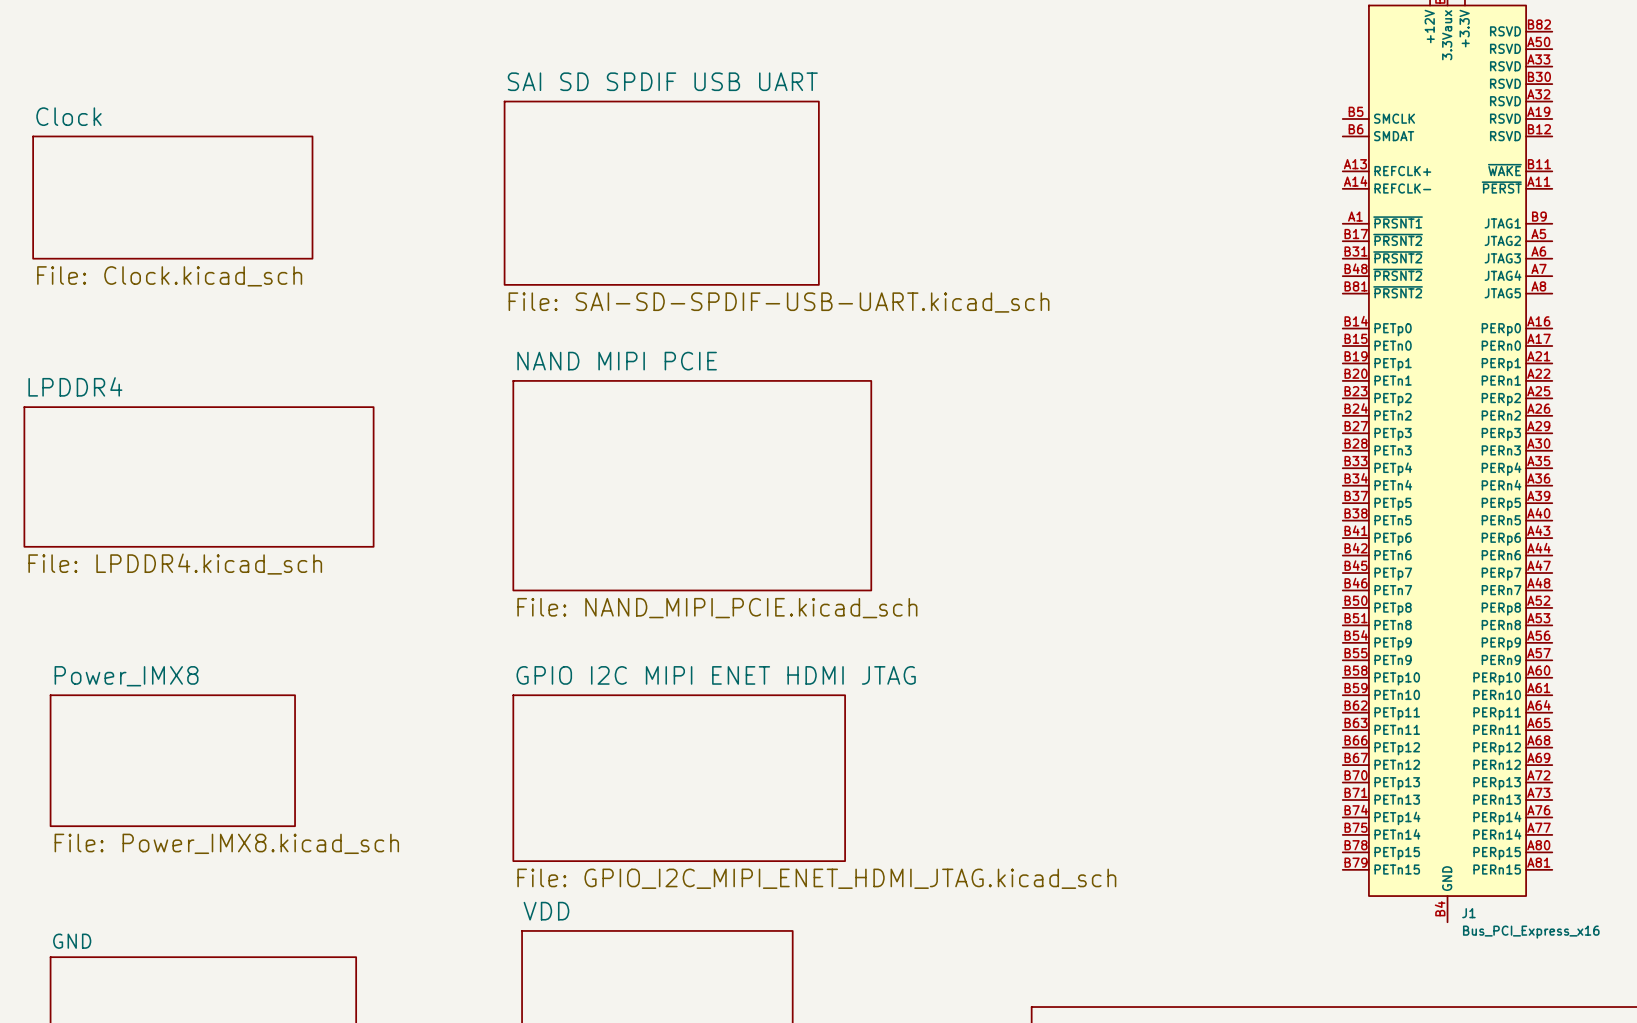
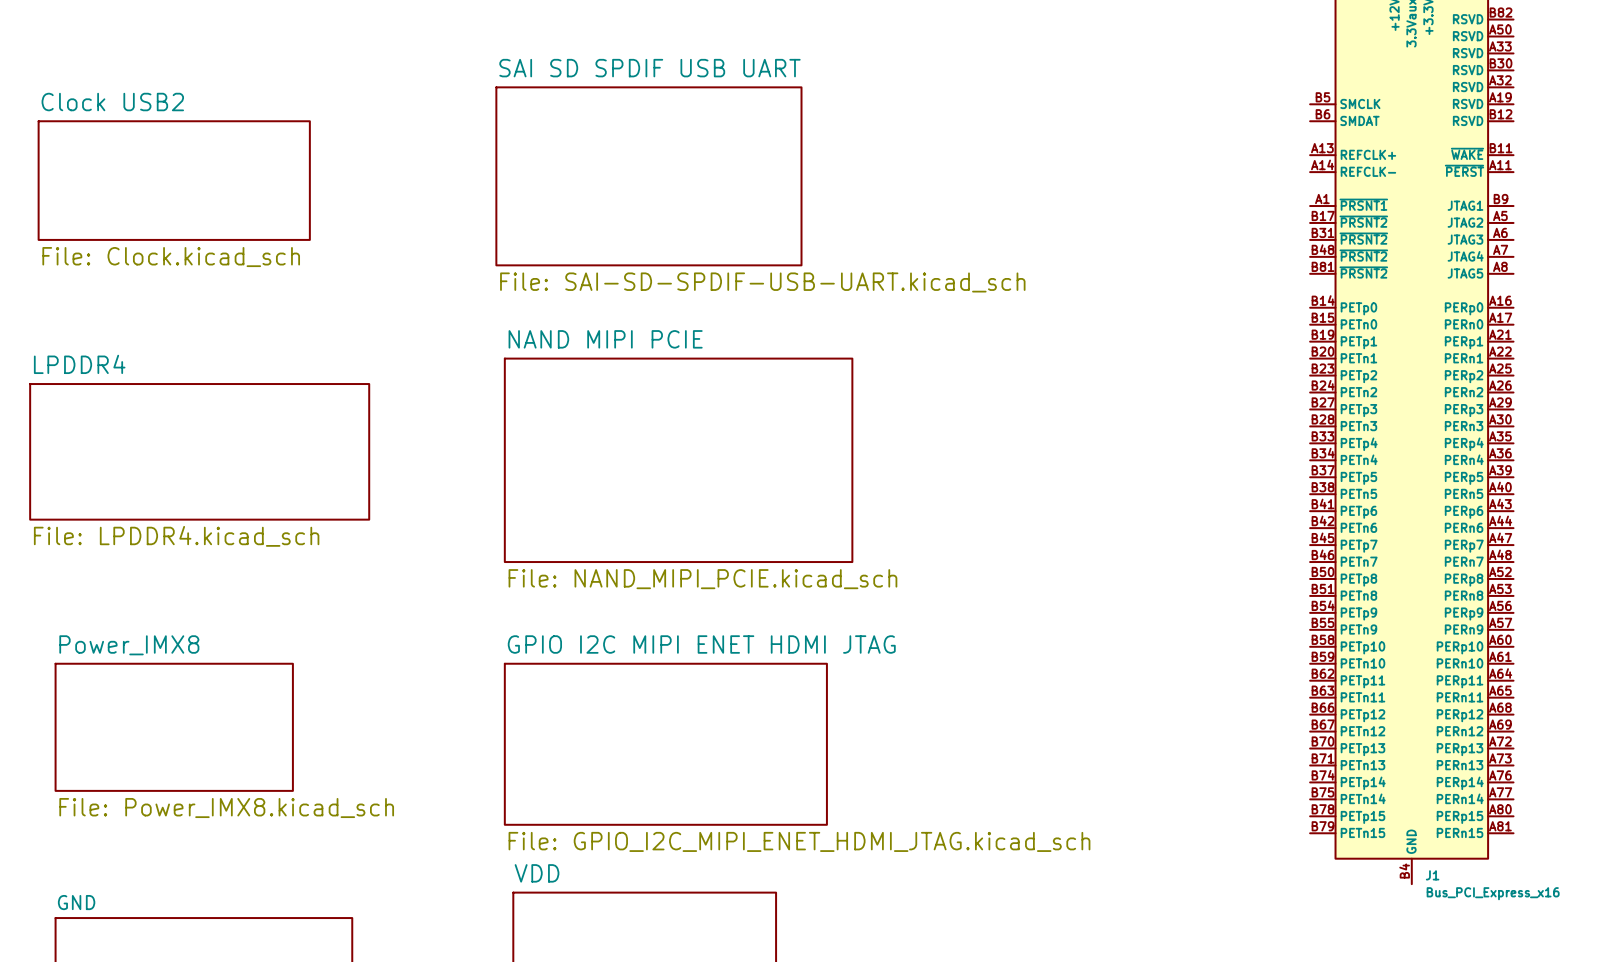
sheet Clock name: Clock (68, 116) -> Clock USB2 (112, 102)

